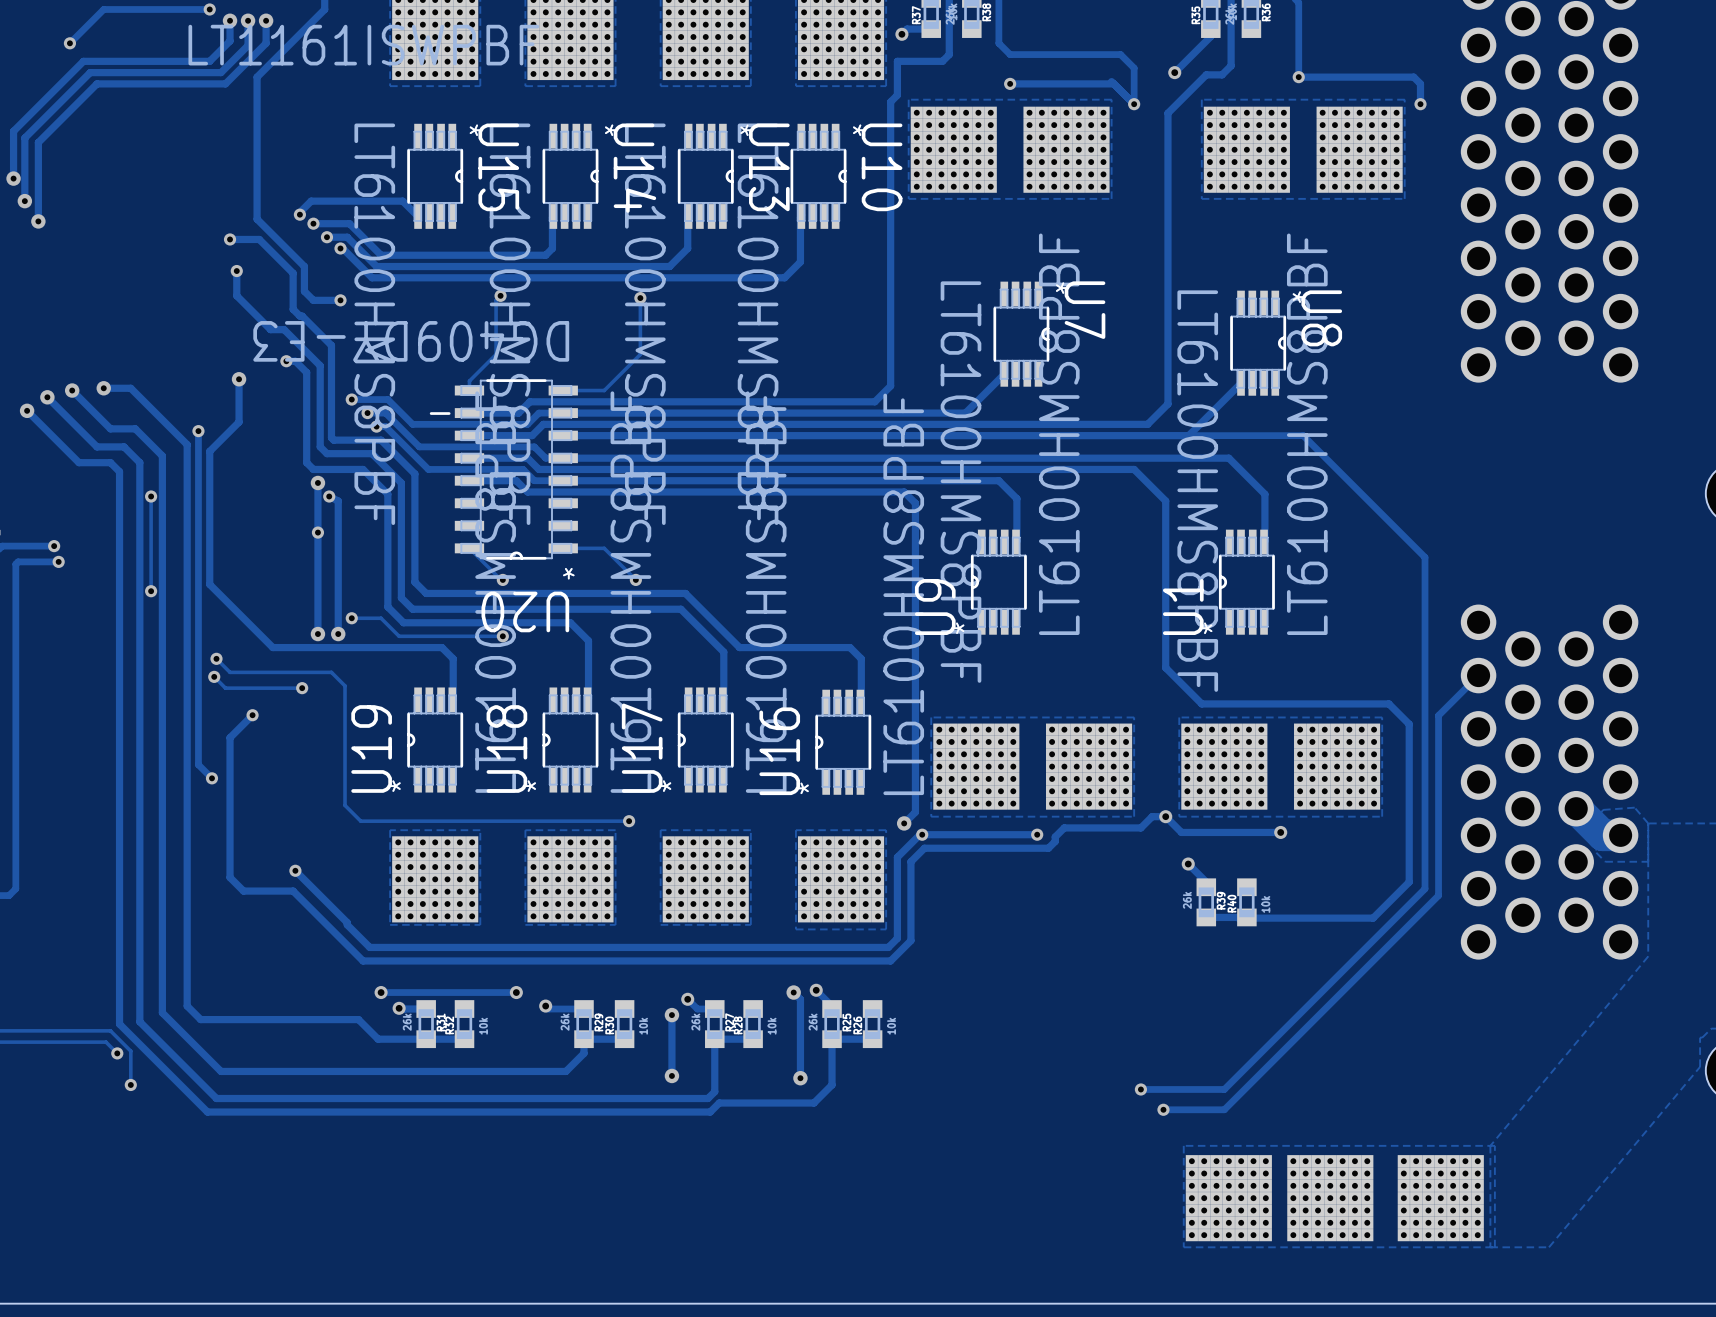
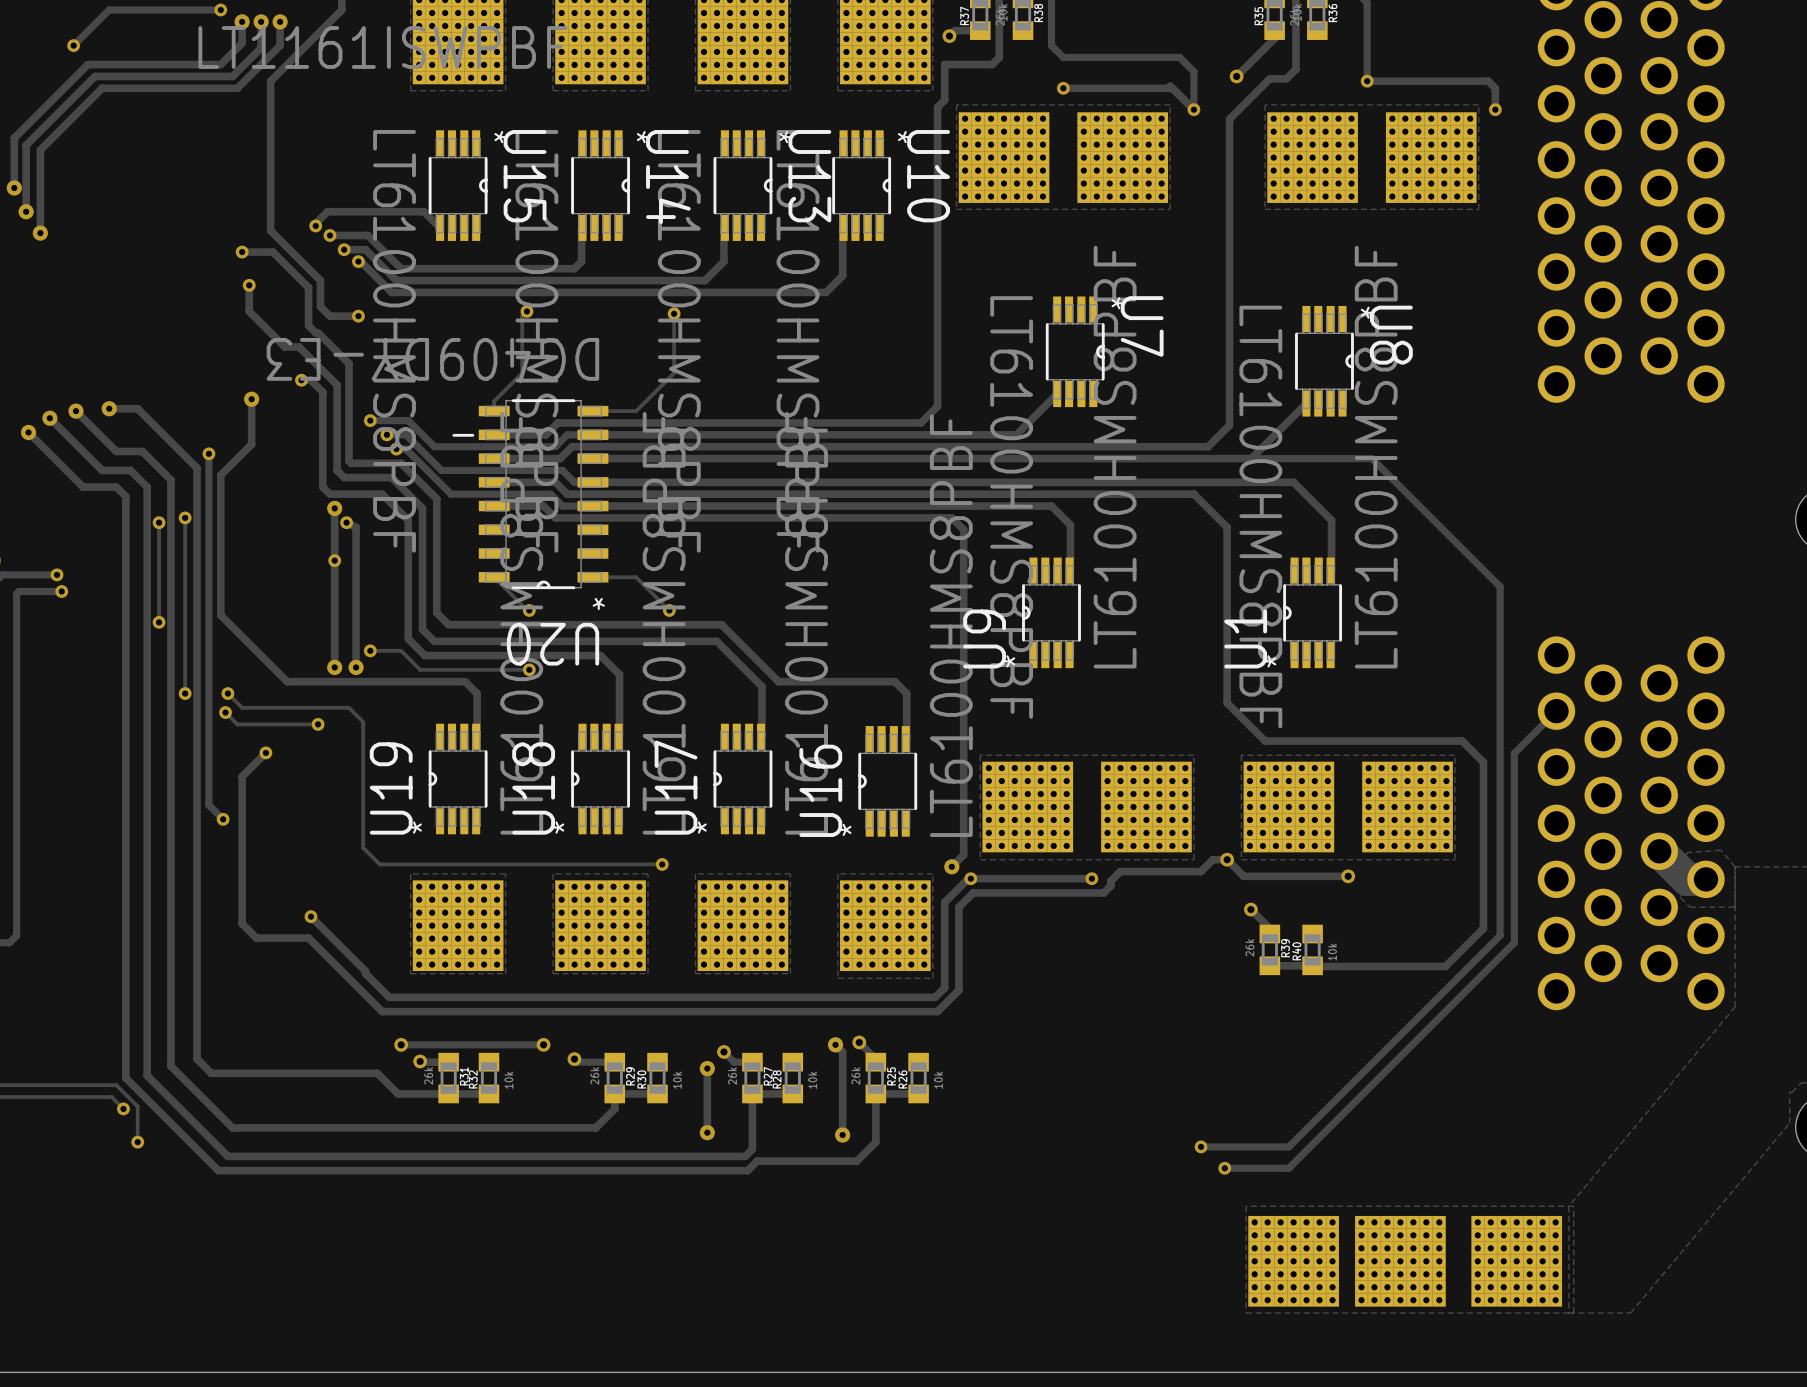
track: none -> (185, 517) (185, 693)
via: none -> (185, 517)
via: none -> (185, 693)

